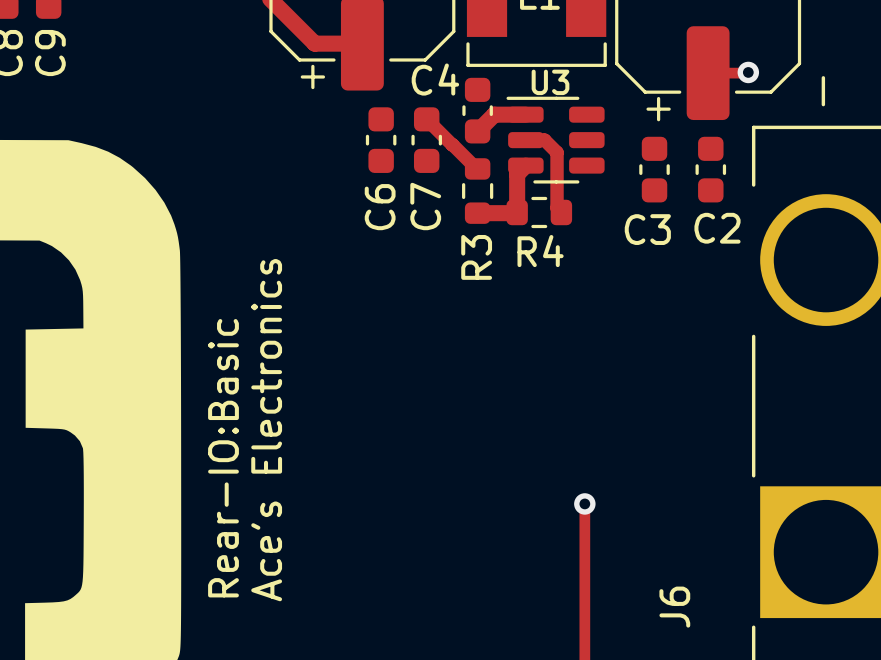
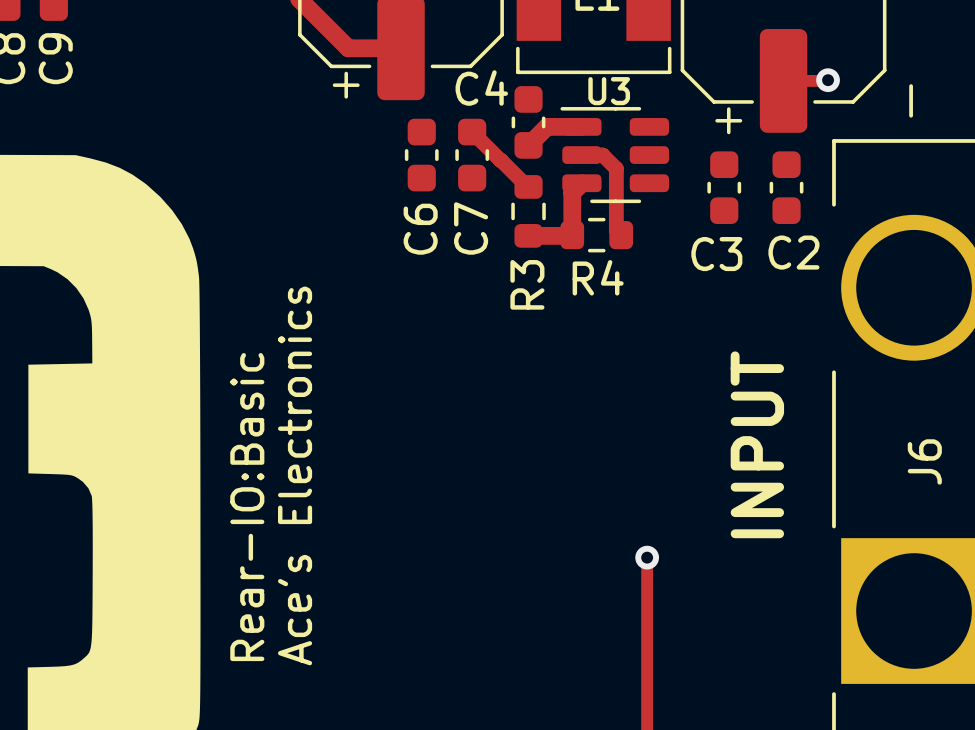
text: none -> INPUT (757, 444)
J6 name position: J6 (674, 607) -> J6 (924, 461)

